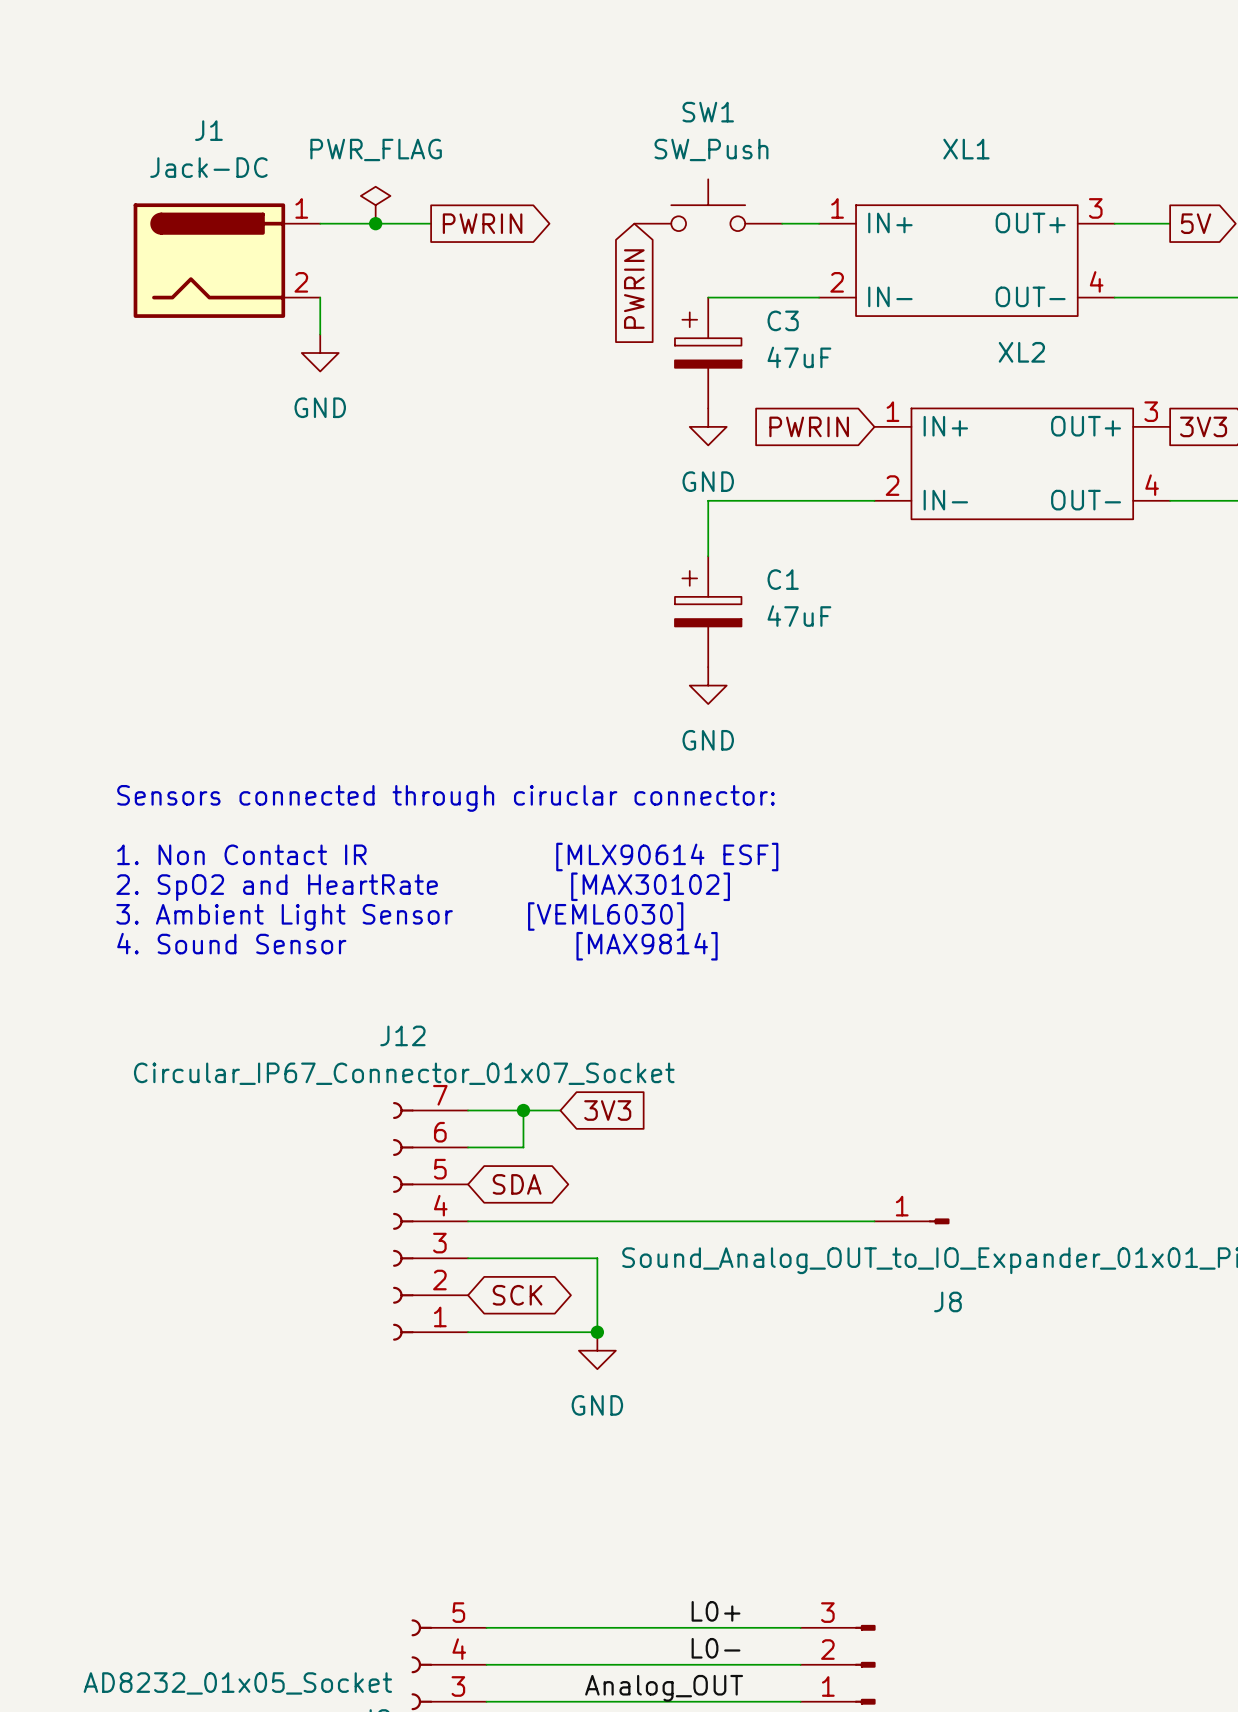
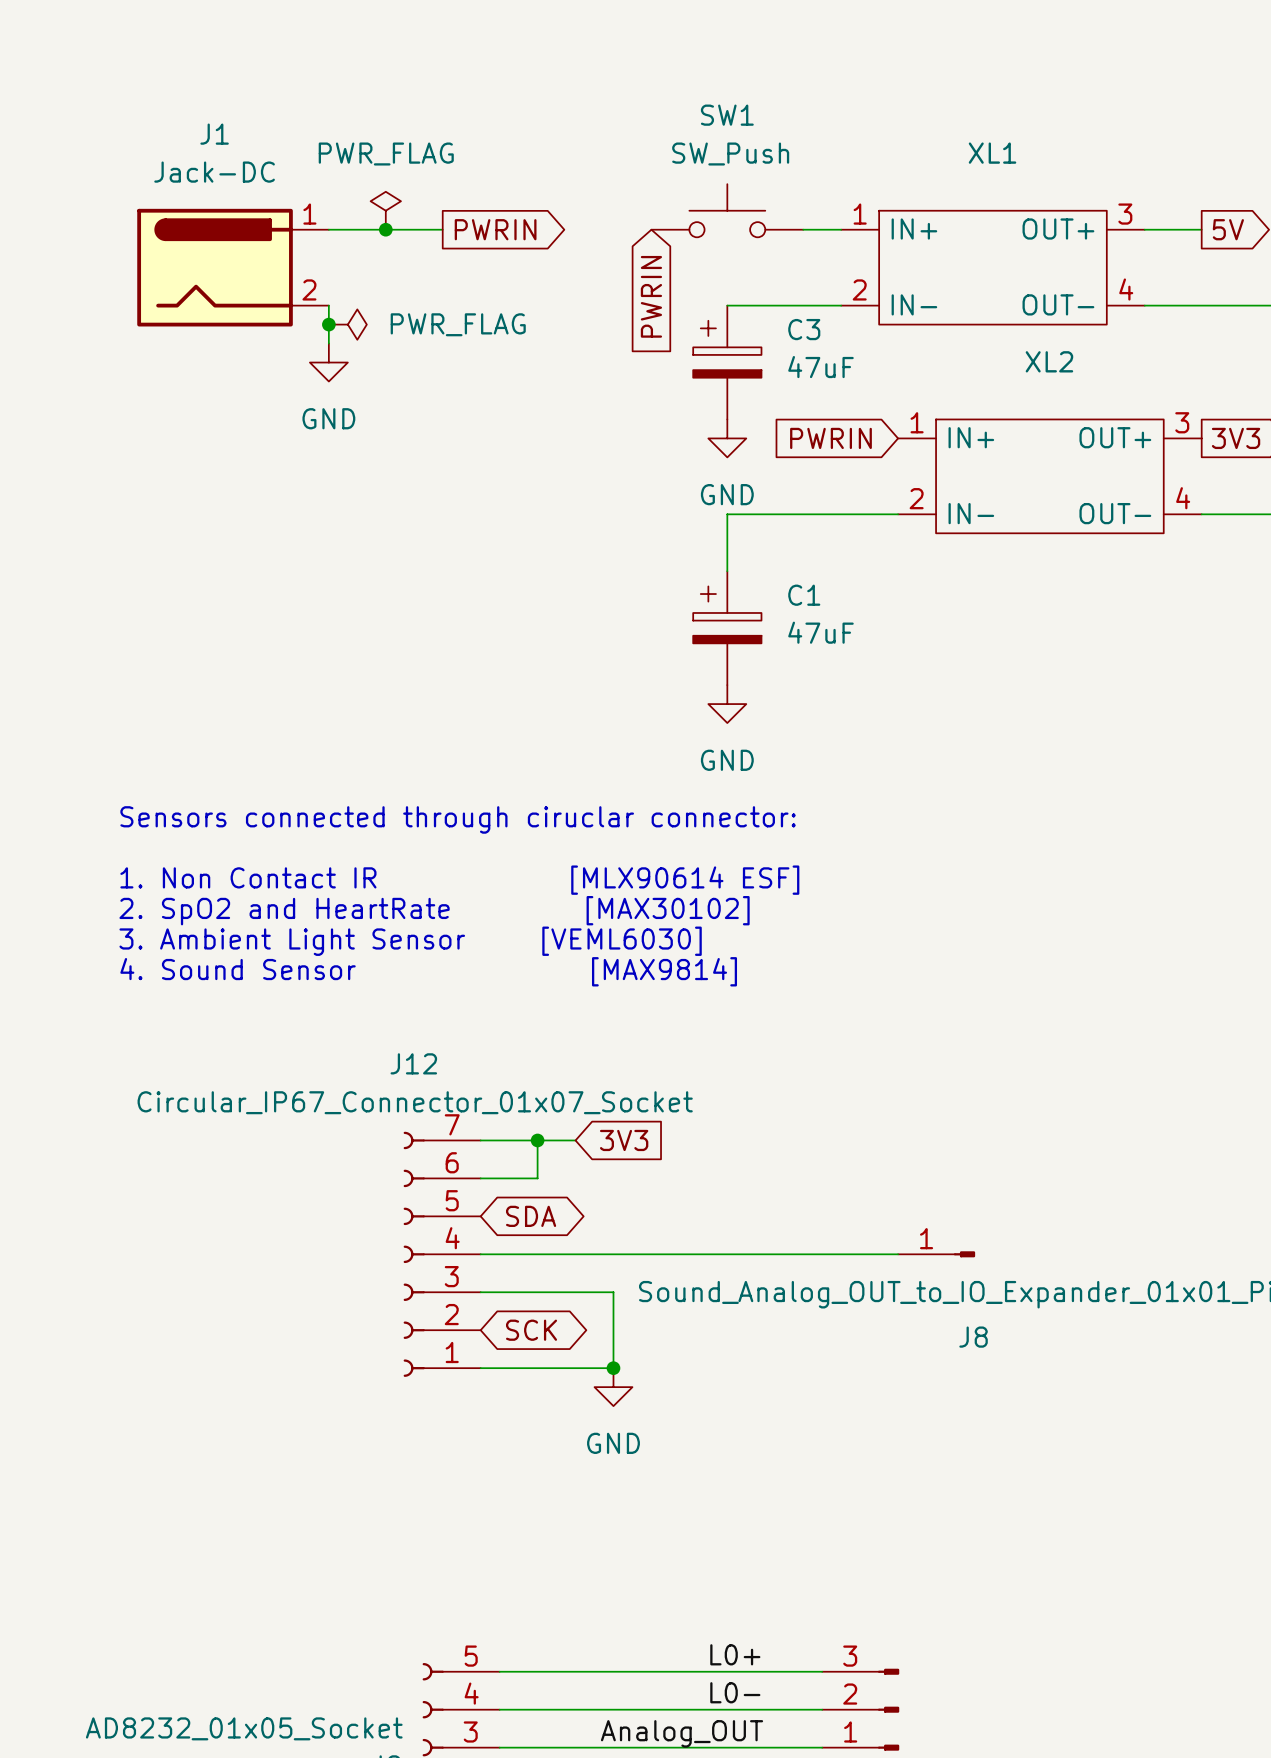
junction: none -> (328, 324)
power symbol: none -> PWR_FLAG (347, 324)

